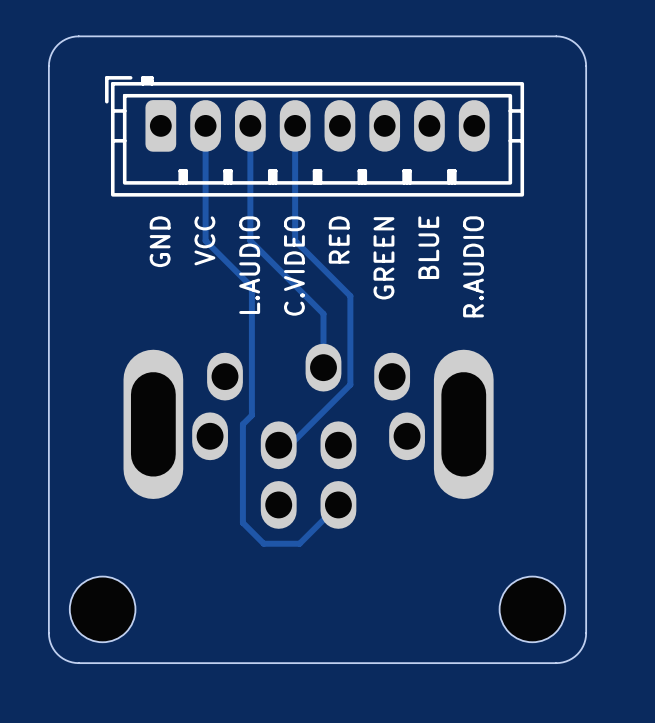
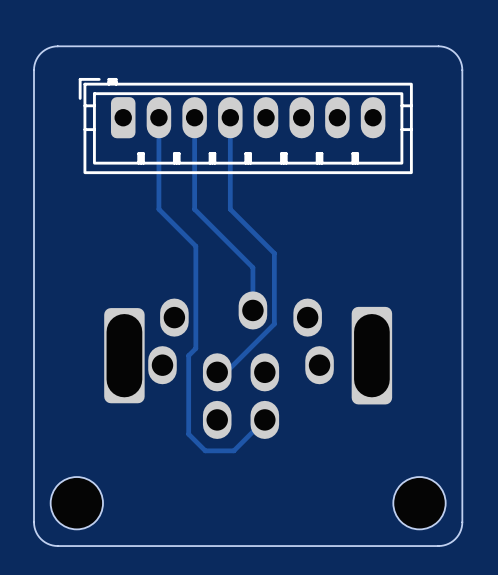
text: RED (339, 239) -> none
text: VCC (204, 240) -> none
text: GND (160, 241) -> none
text: BLUE (428, 247) -> none
text: GREEN (383, 258) -> none
text: L.AUDIO (249, 265) -> none
text: C.VIDEO (294, 266) -> none
text: R.AUDIO (473, 266) -> none
part footprint: [123, 343, 494, 529] -> [104, 291, 393, 439]

